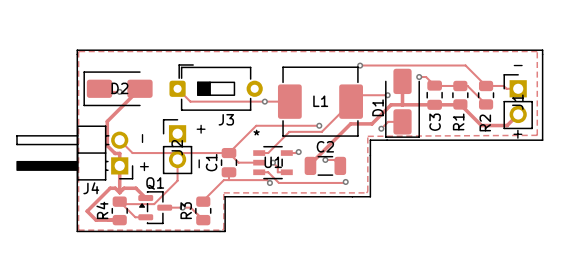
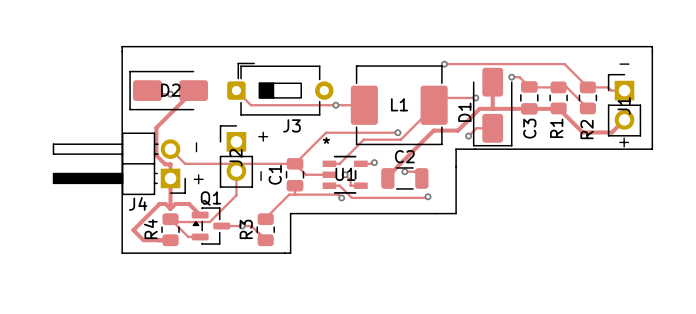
zone outline: (78, 51) (78, 230) (222, 230) (223, 192) (366, 192) (367, 136) (537, 135) (537, 51) (78, 51) -> none

